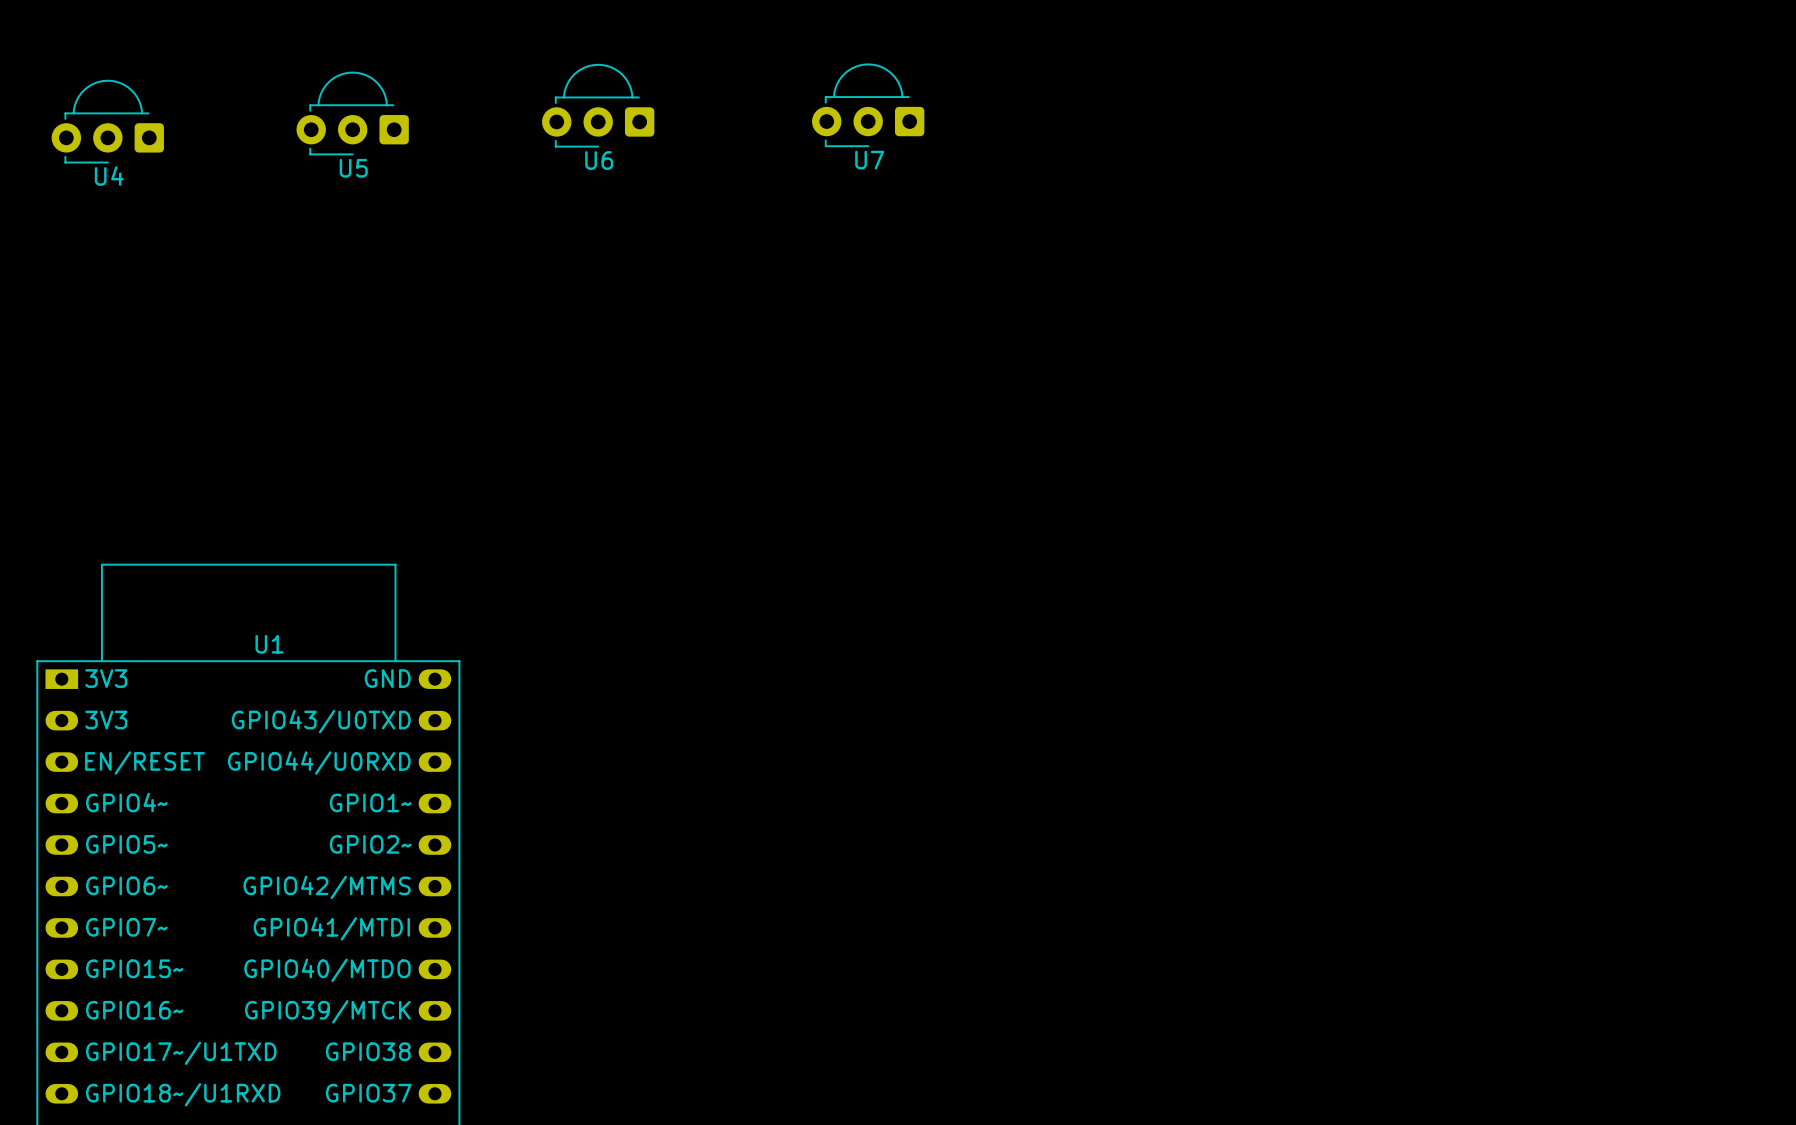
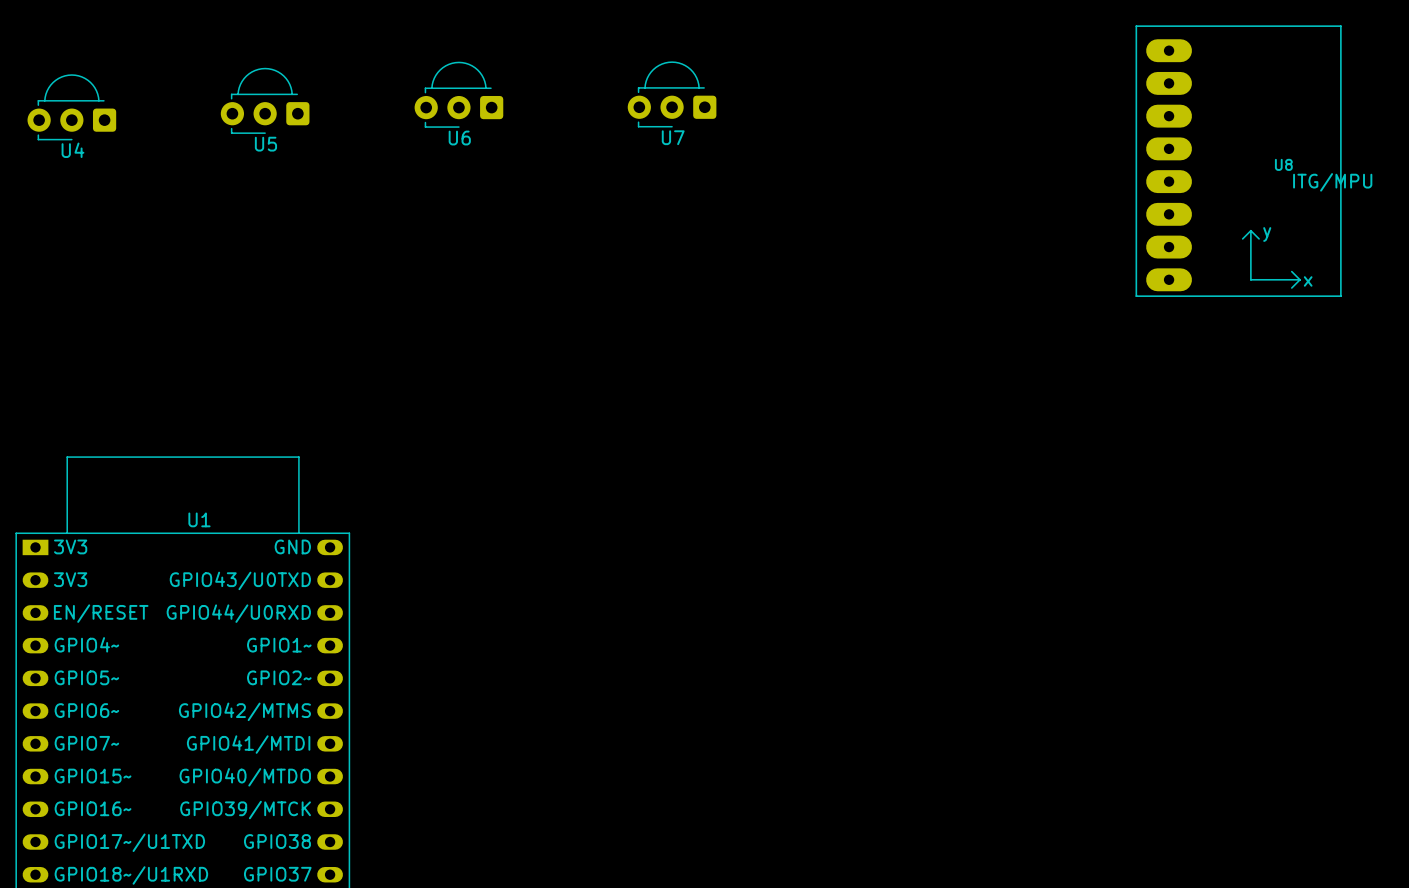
U8: none -> (1238, 161)

